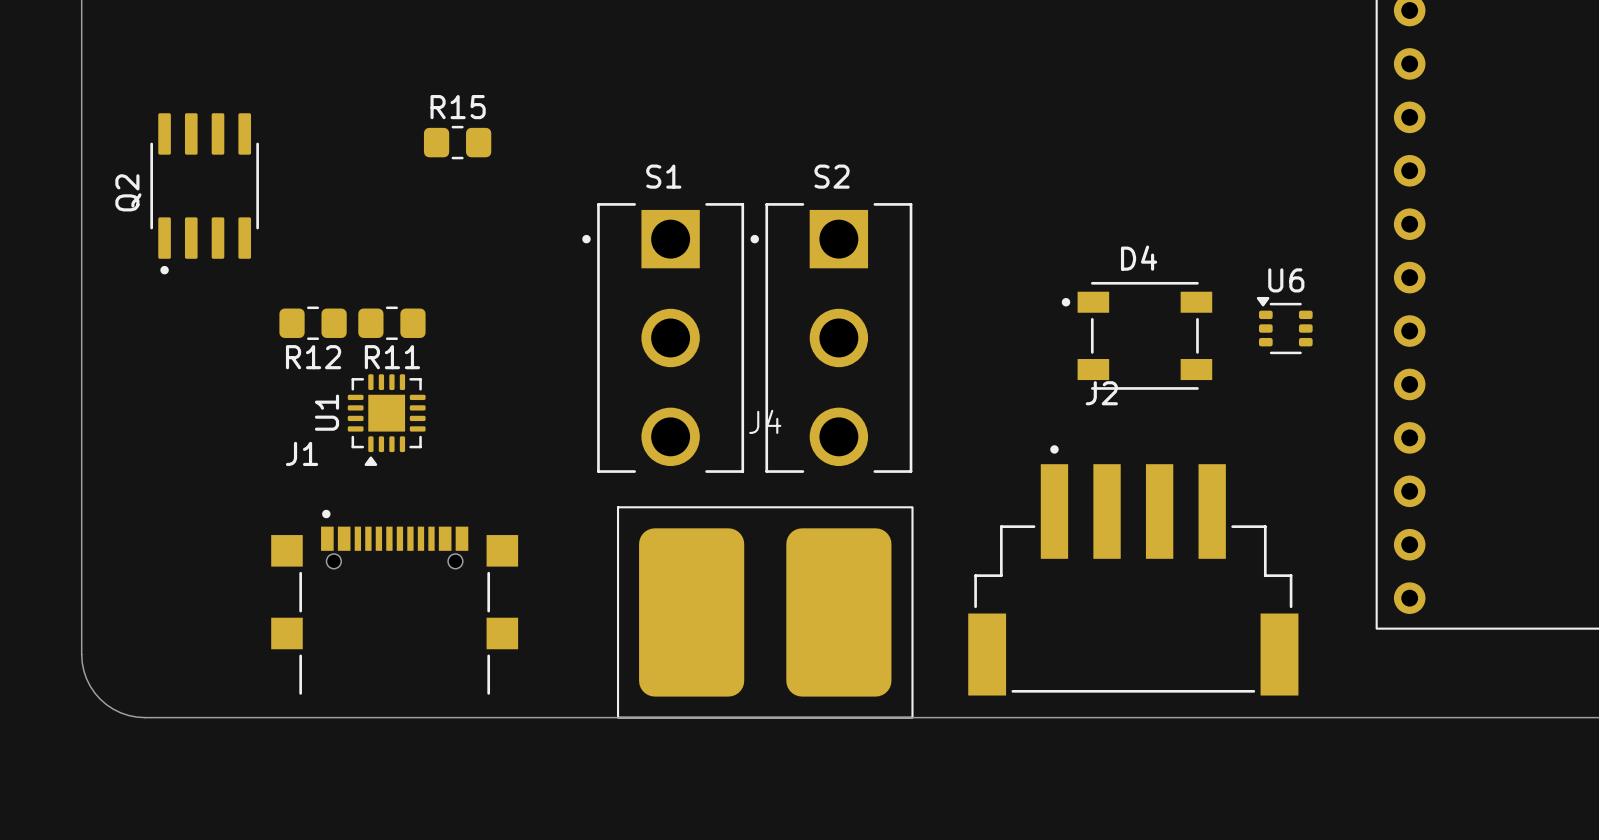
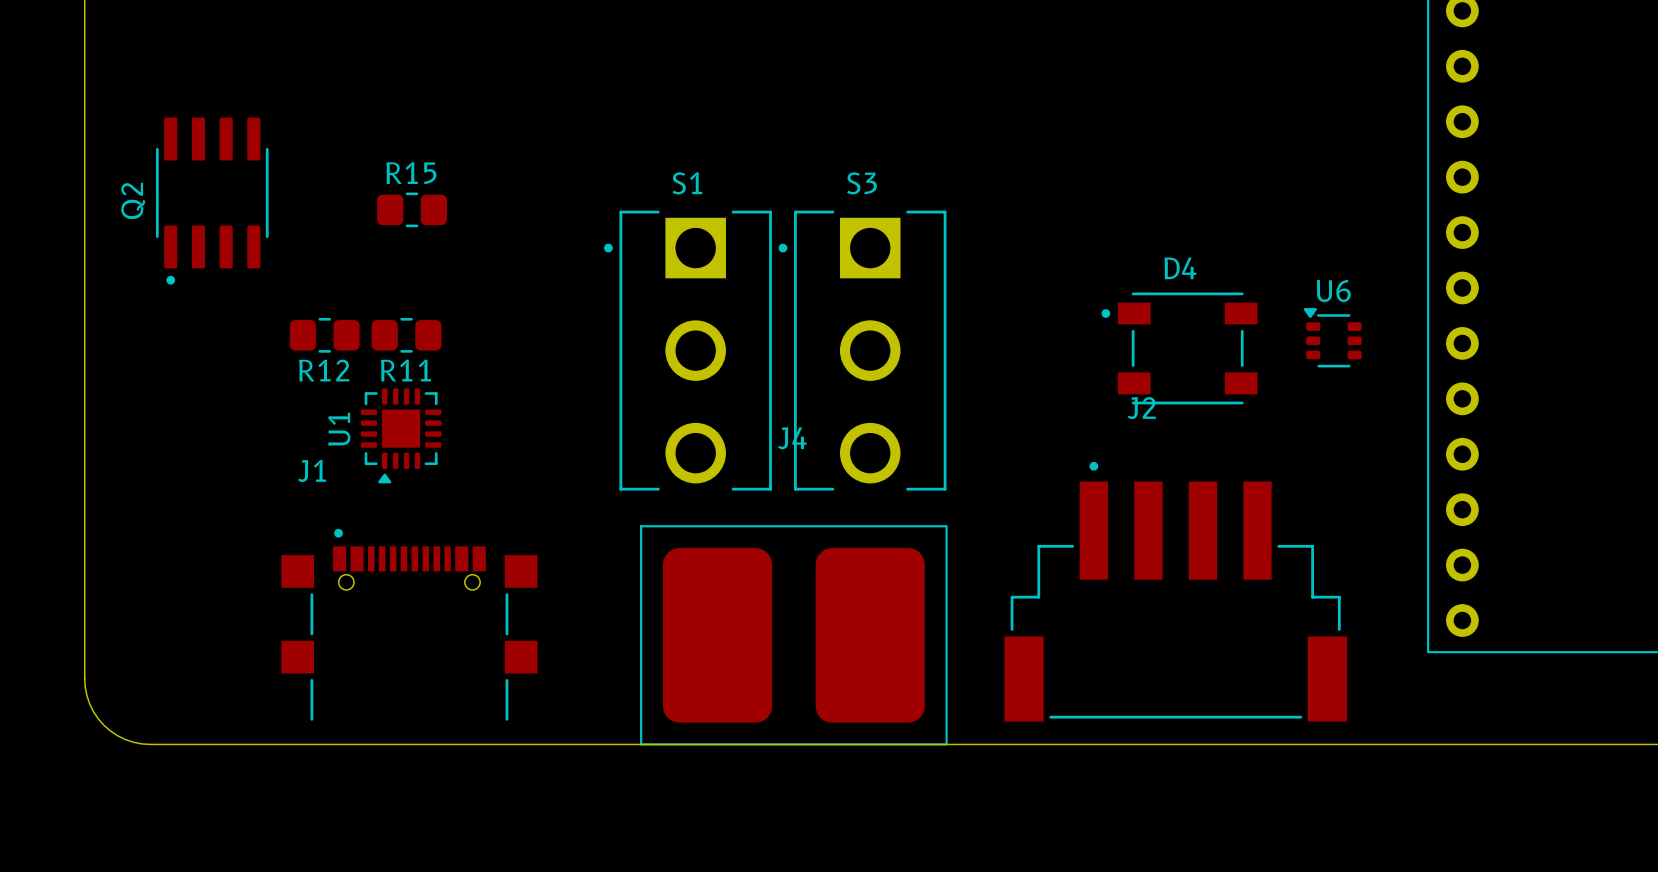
R15 position: (457, 142) -> (412, 209)
S2 name: S2 (832, 176) -> S3 (861, 183)

